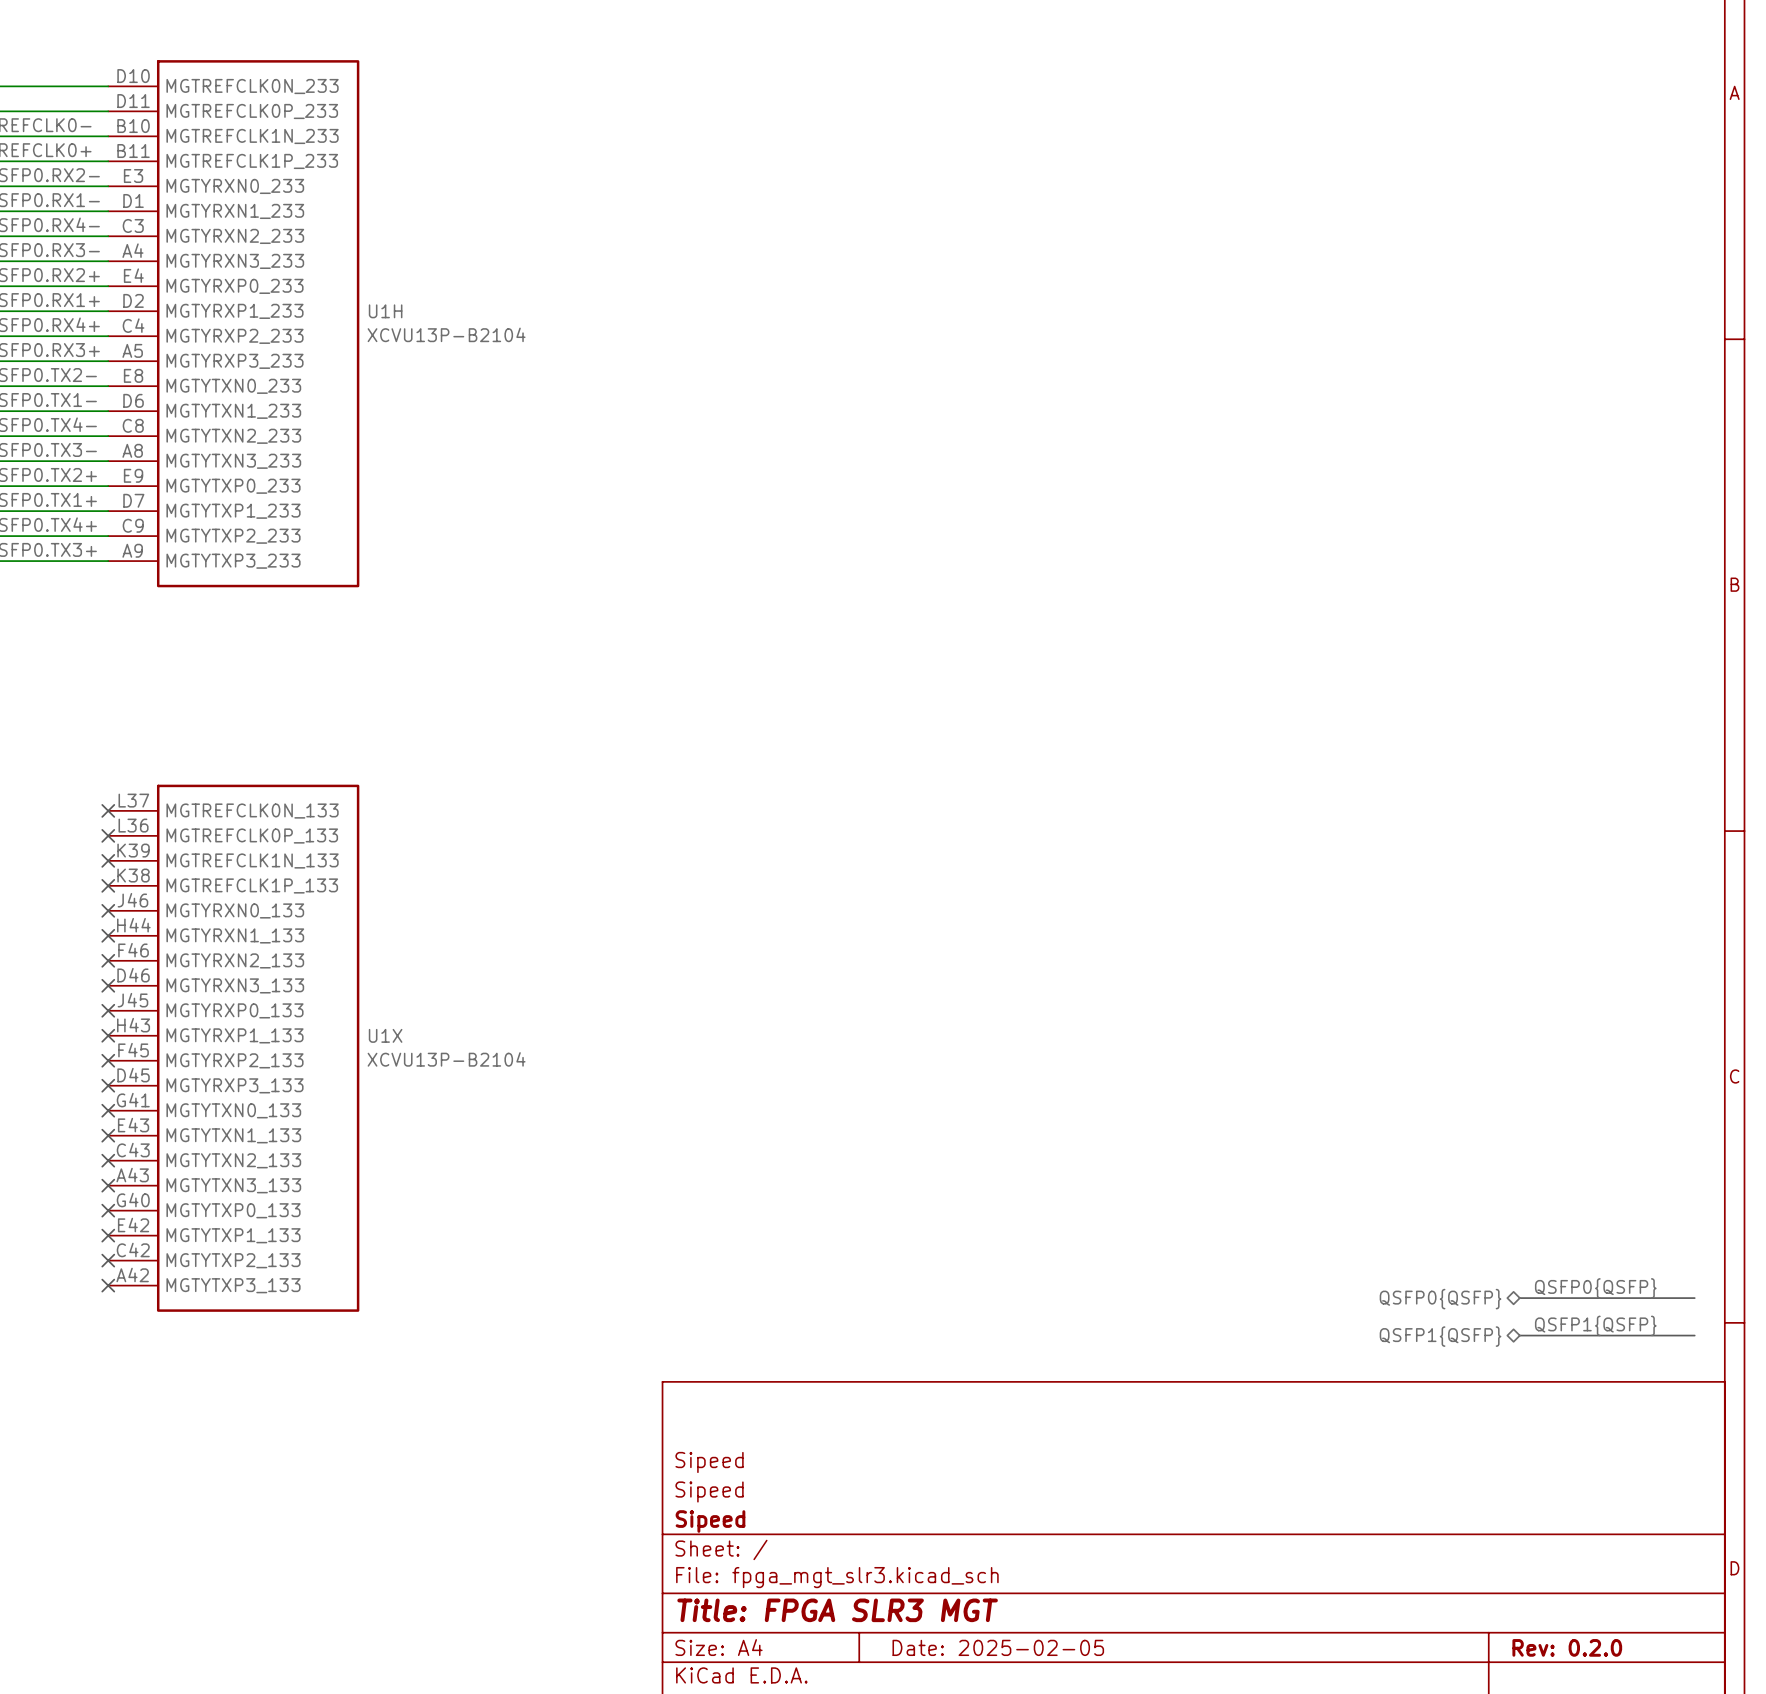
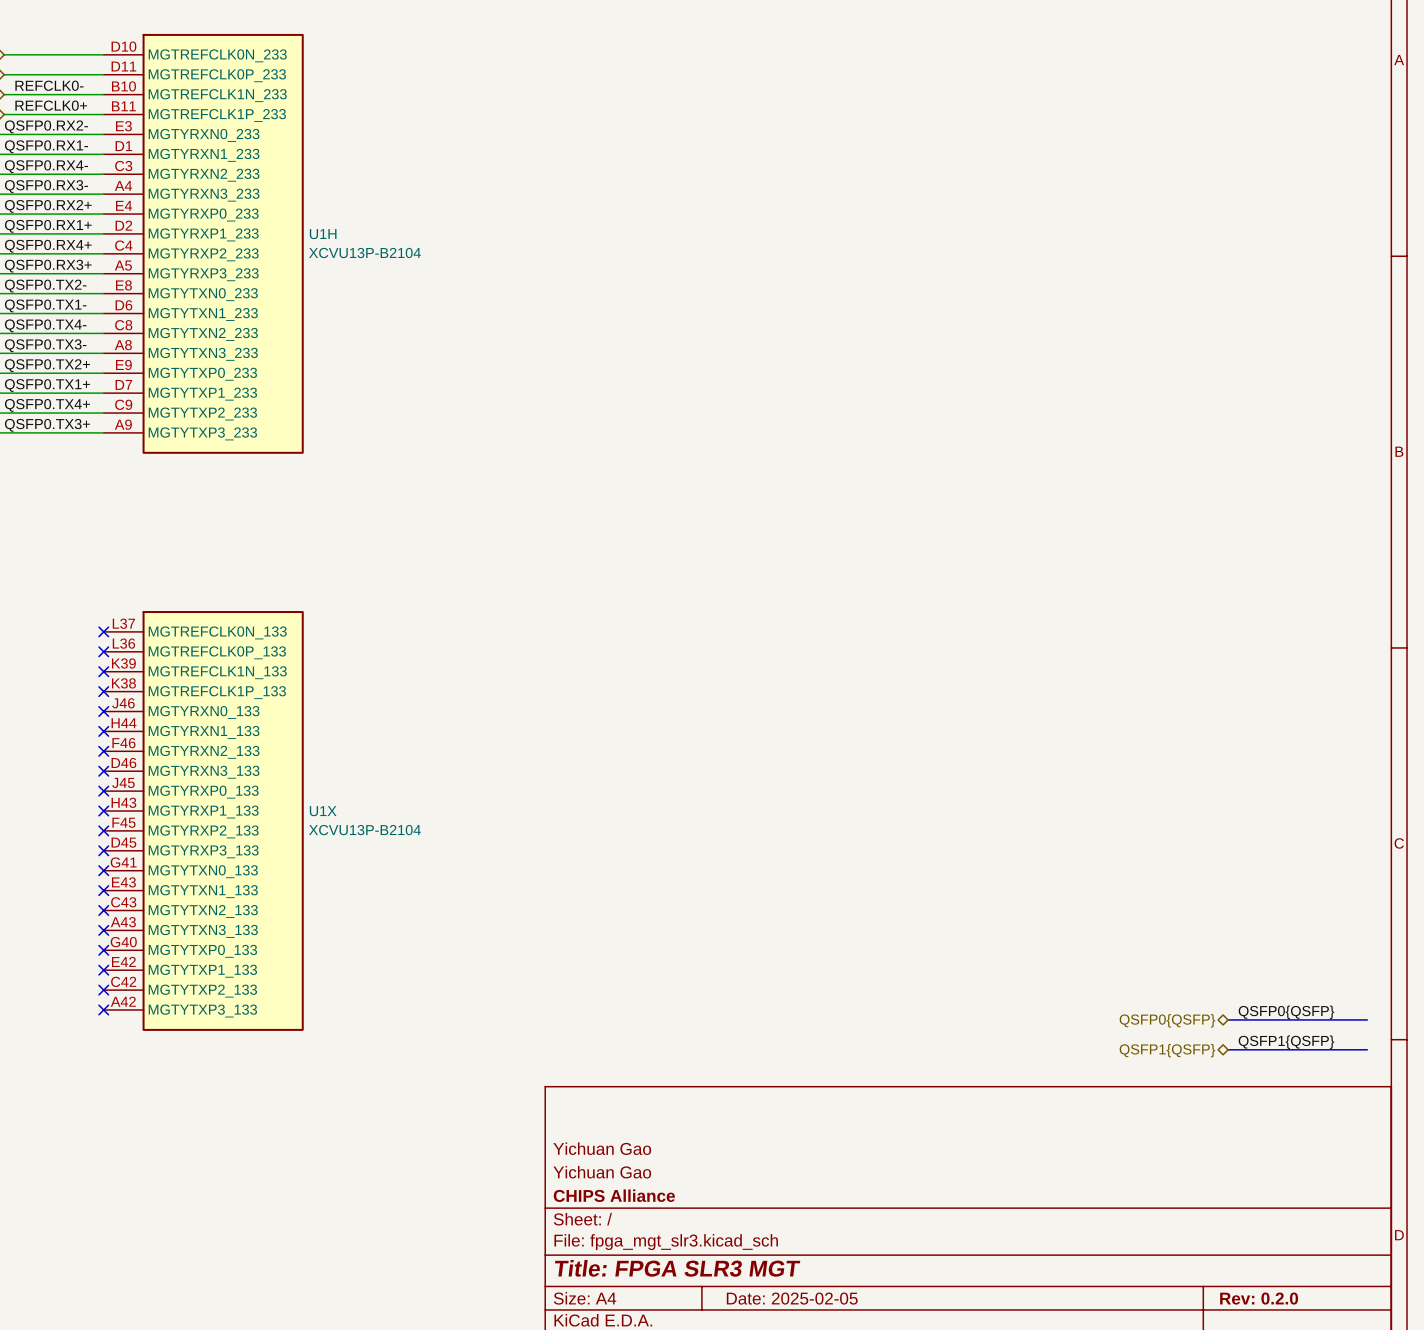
title block: Sipeed (709, 1462) -> Yichuan Gao (602, 1148)
title block: Sipeed (709, 1491) -> Yichuan Gao (602, 1172)
title block: Sipeed (710, 1521) -> CHIPS Alliance (614, 1195)

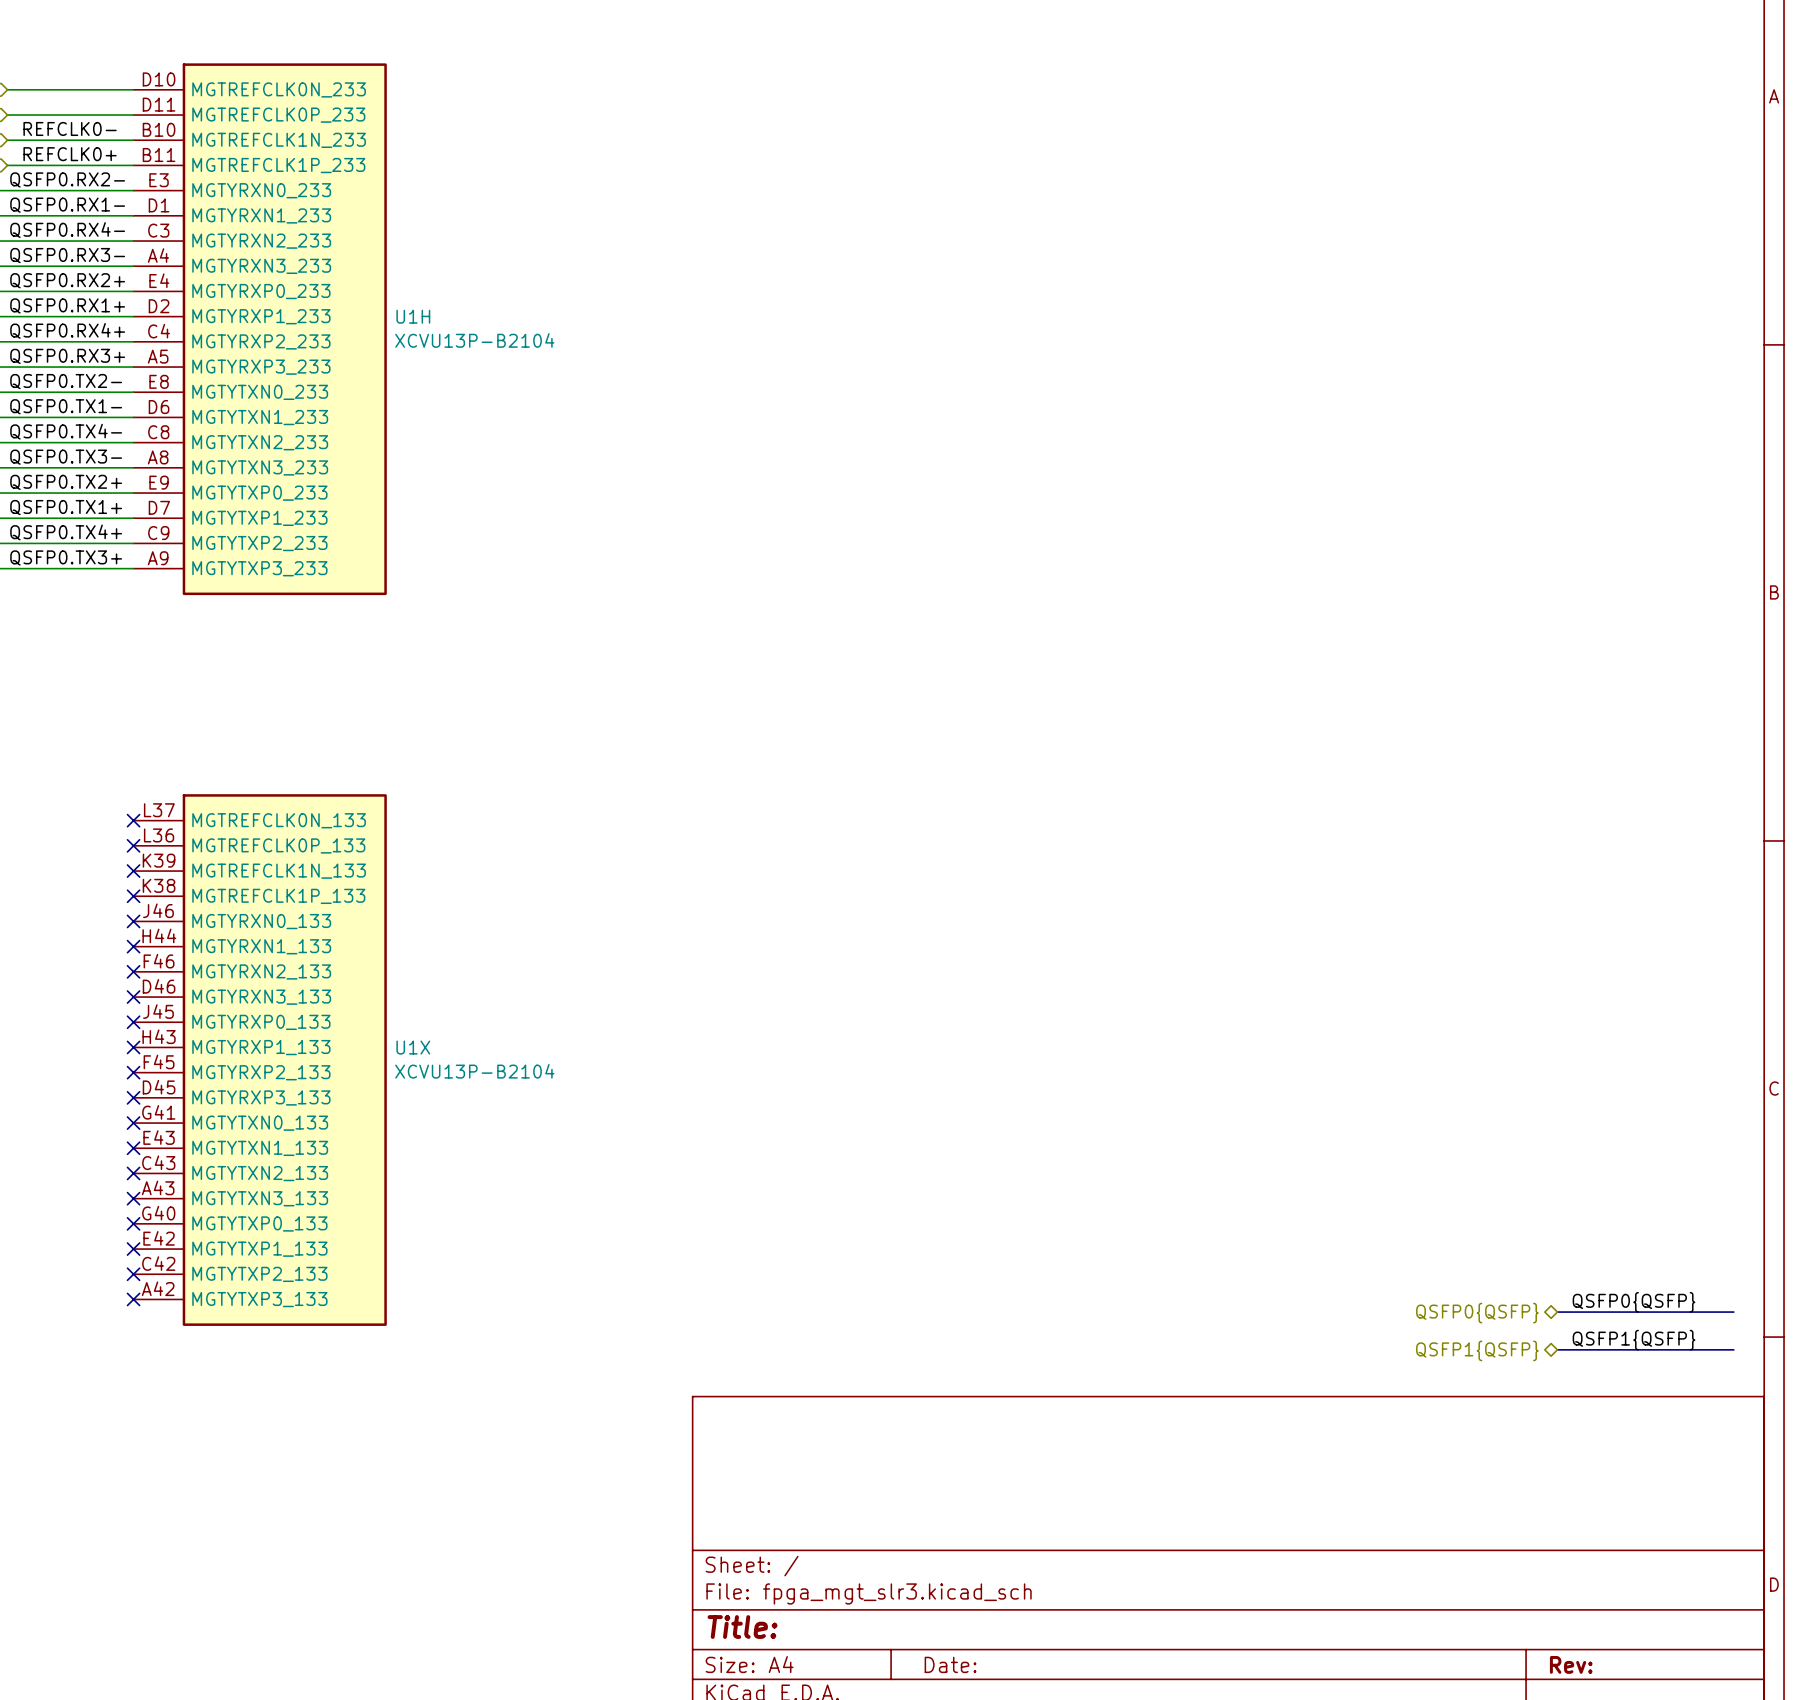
title block: Yichuan Gao (602, 1148) -> none
title block: Yichuan Gao (602, 1172) -> none
title block: CHIPS Alliance (614, 1195) -> none
title block: Title: FPGA SLR3 MGT (677, 1268) -> Title: (742, 1627)
title block: Date: 2025-02-05 (792, 1298) -> Date: (950, 1664)
title block: Rev: 0.2.0 (1259, 1298) -> Rev: (1571, 1664)

